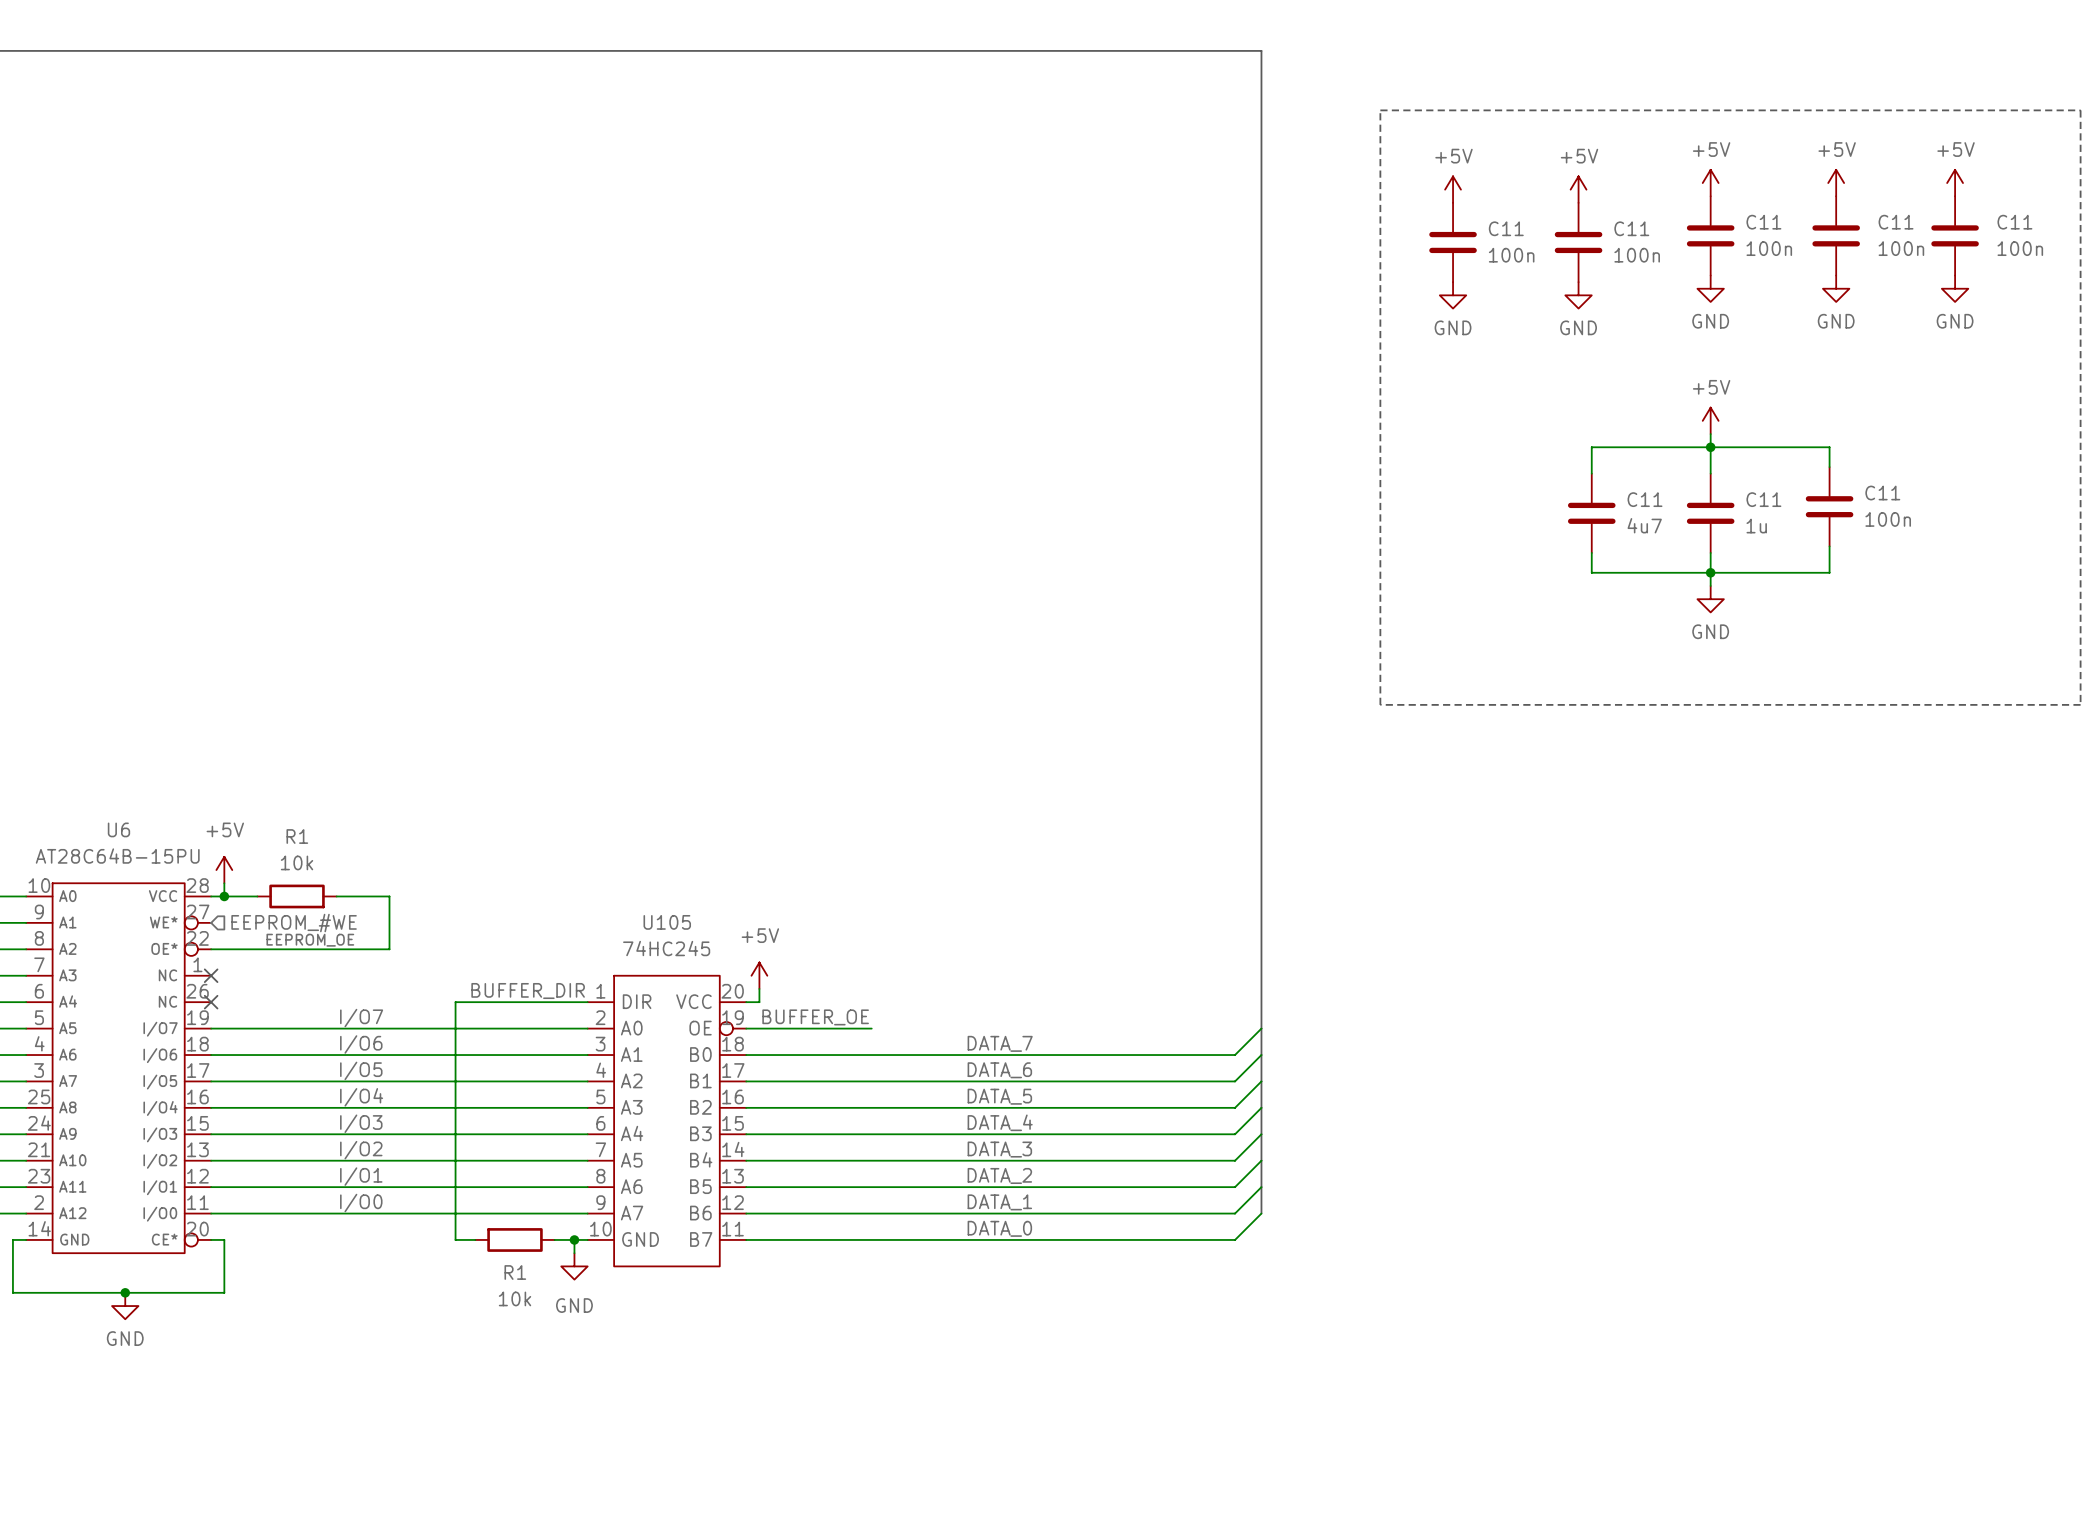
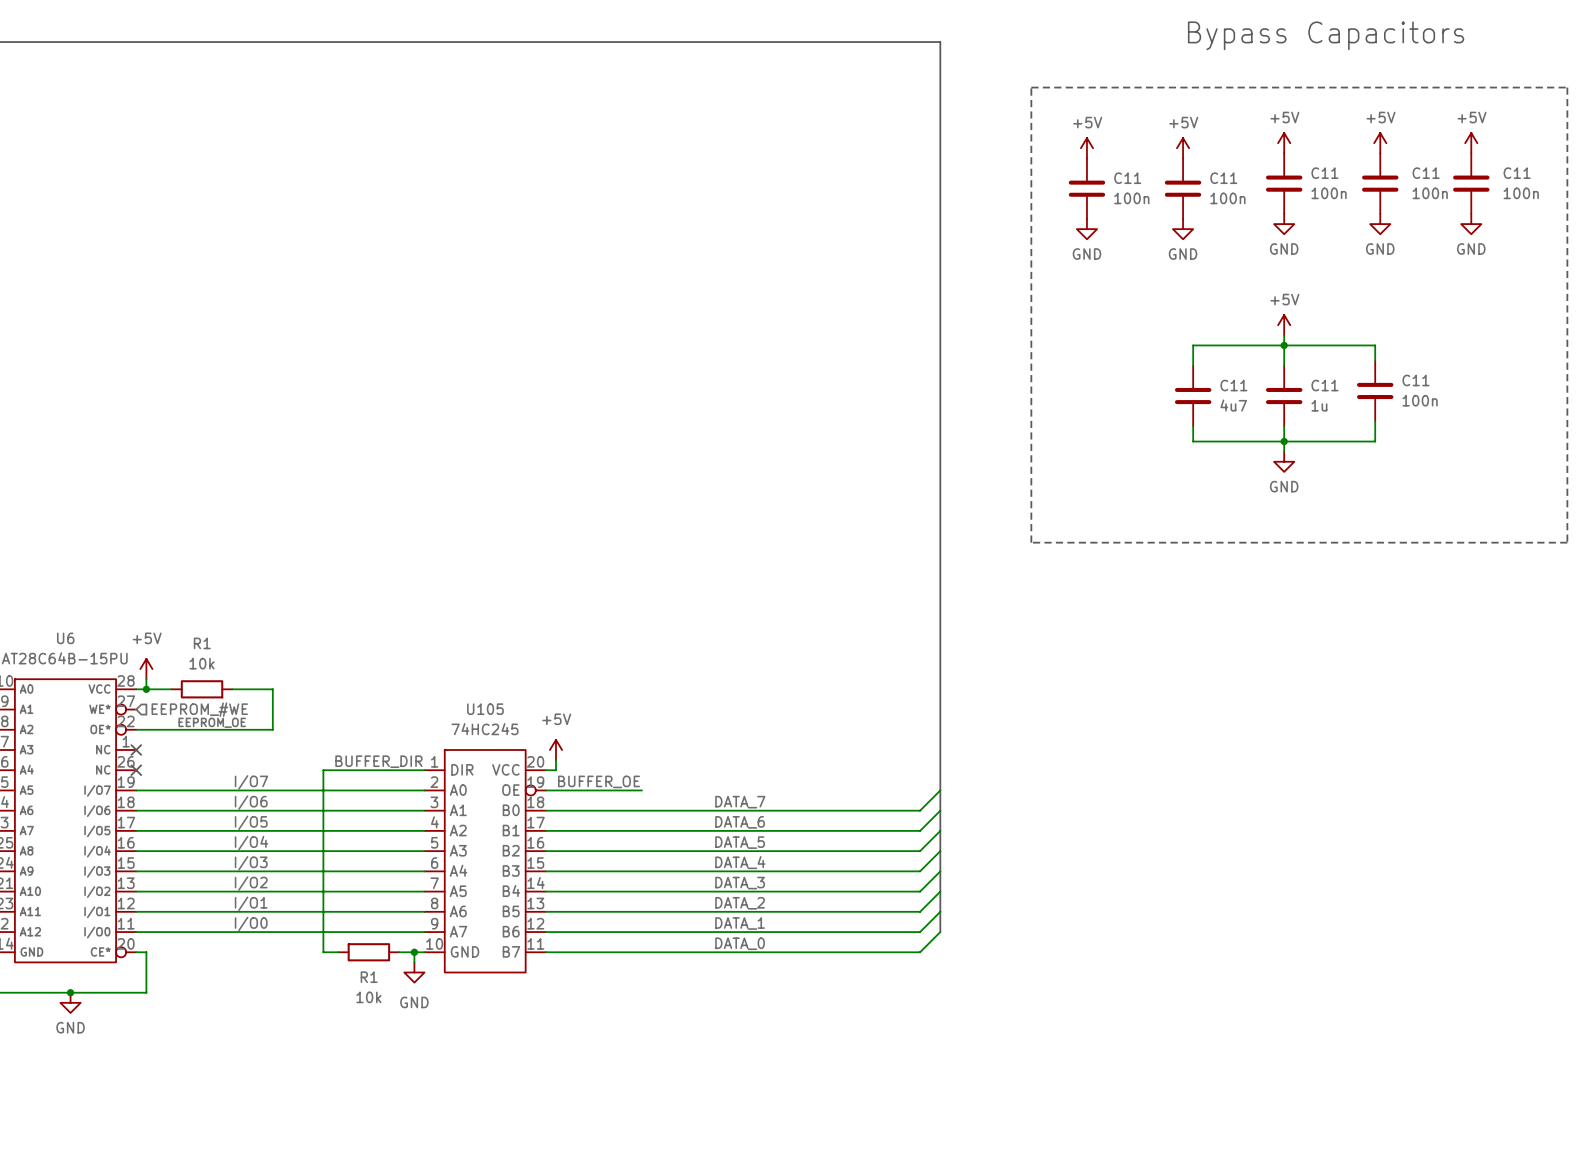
text: none -> Bypass Capacitors (1326, 35)

